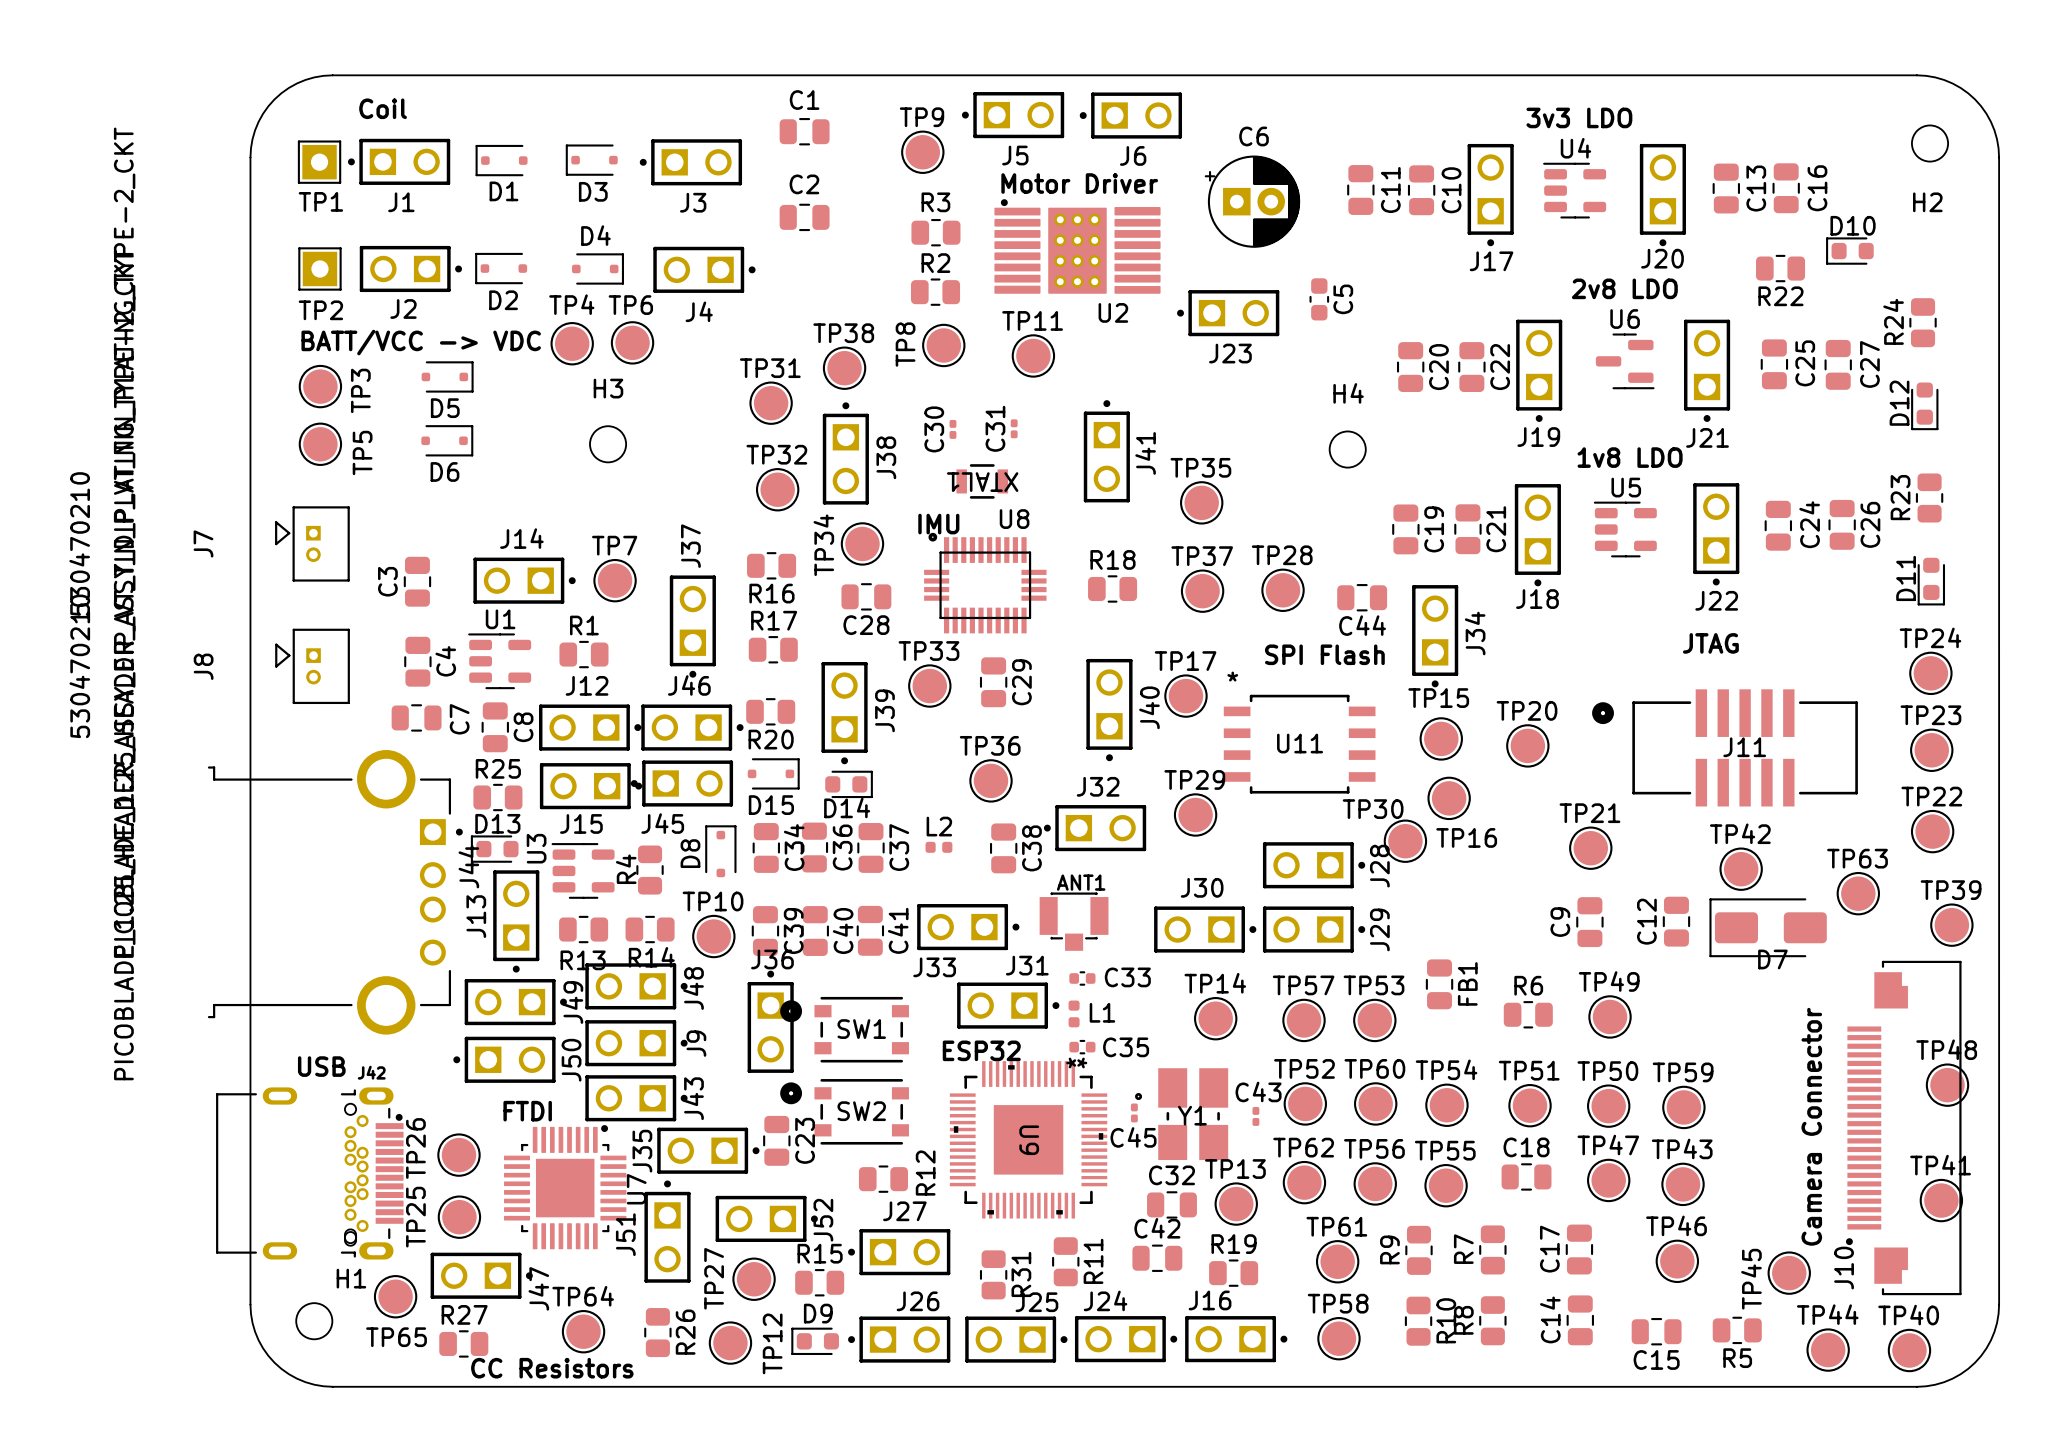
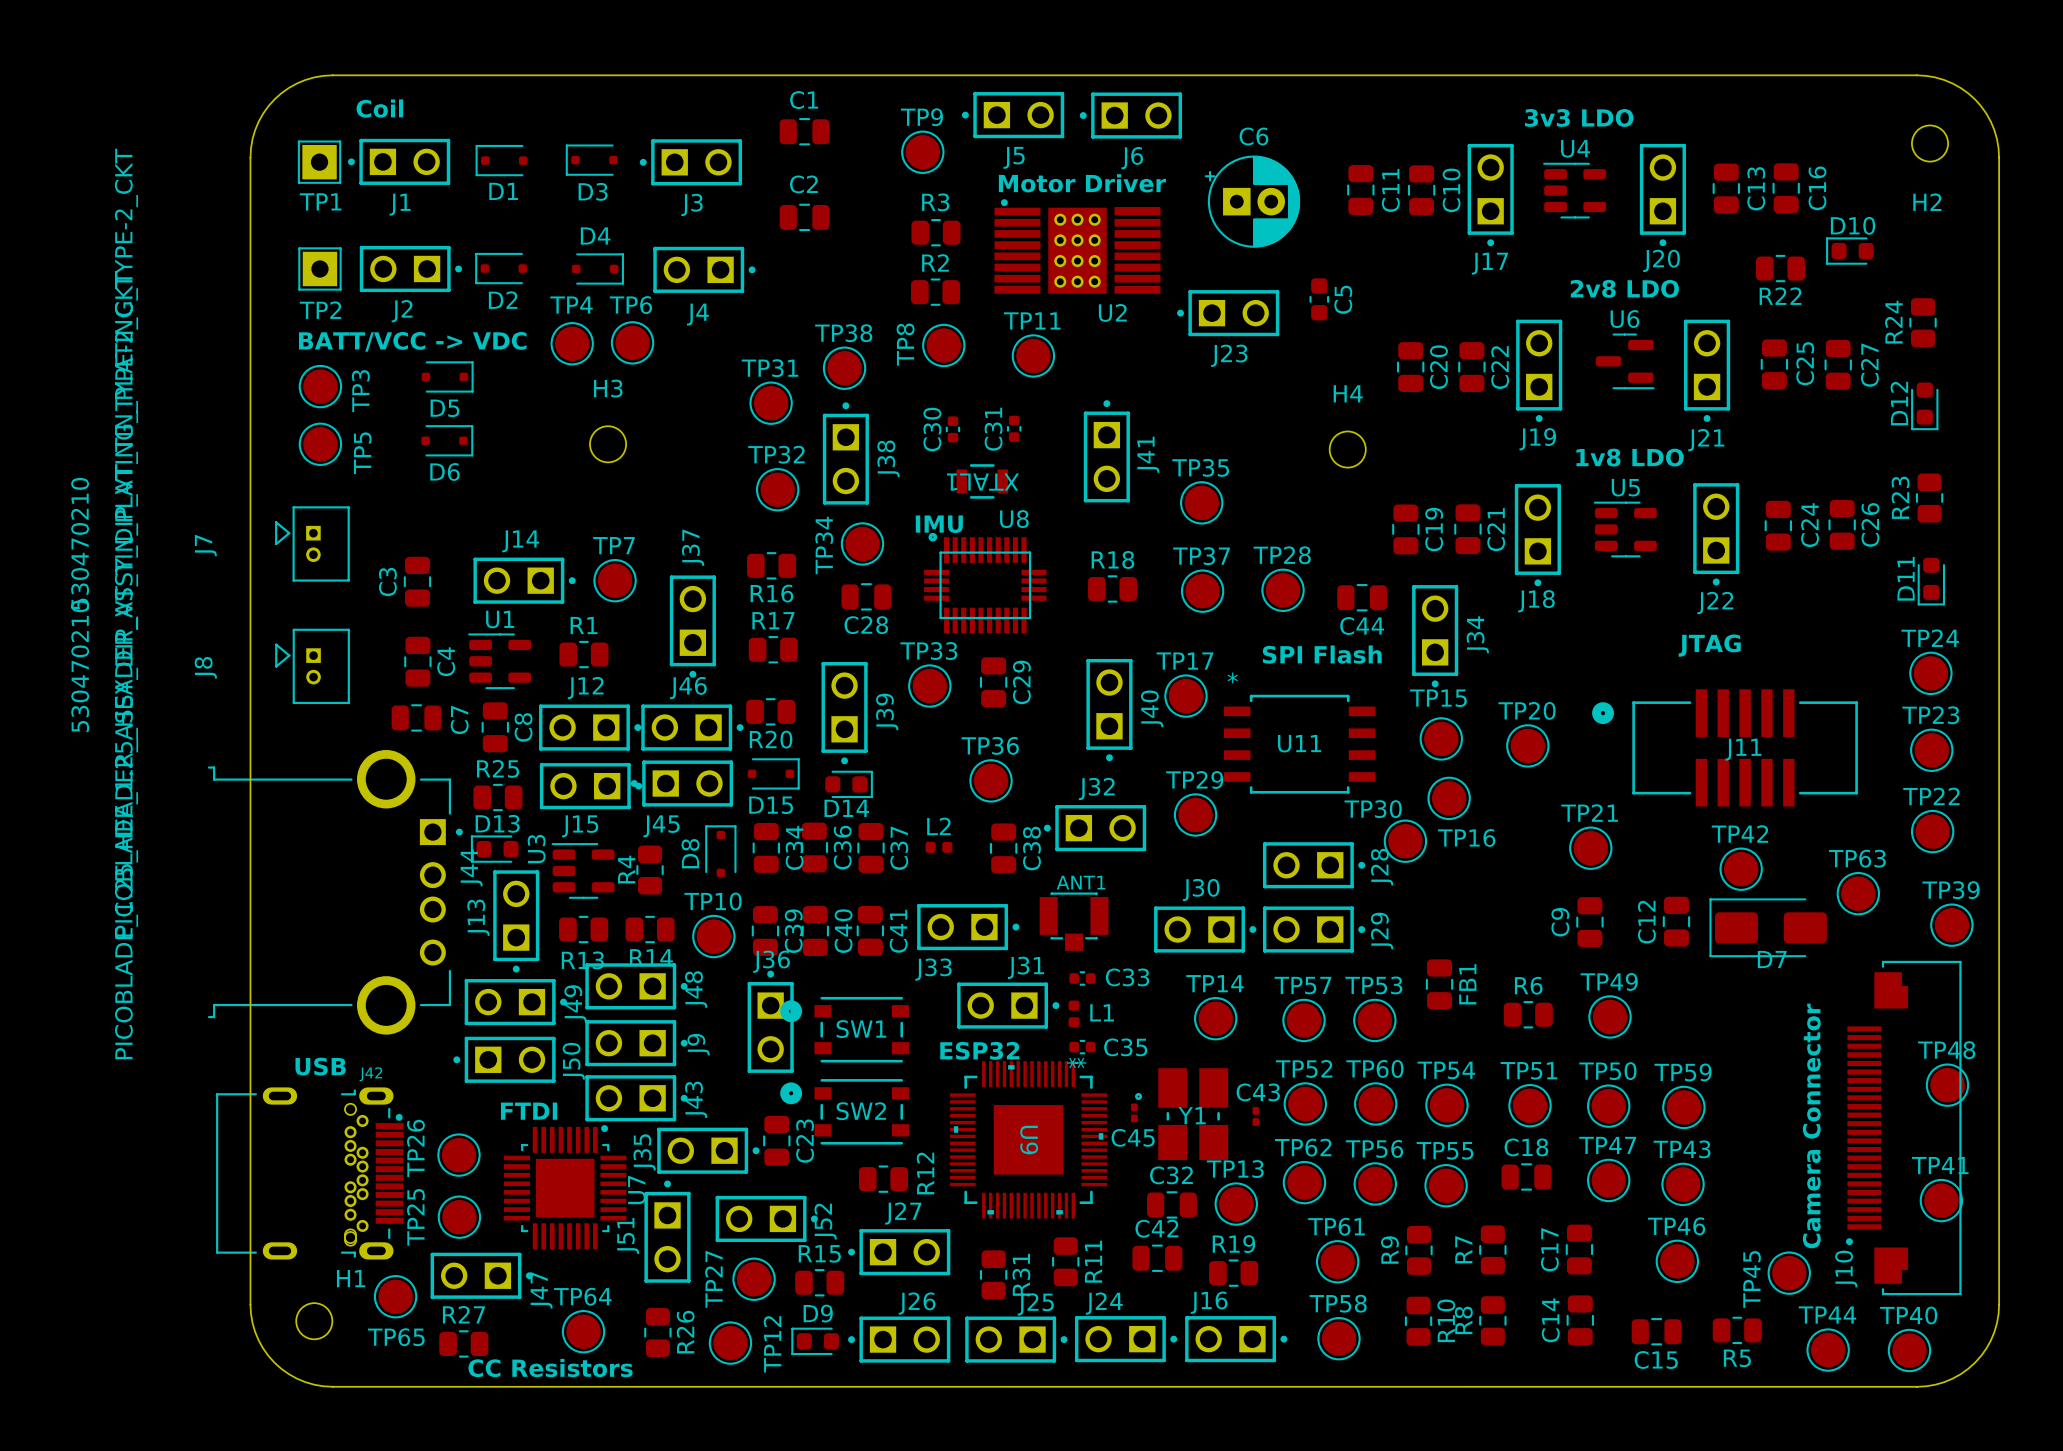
C30 footprint: [949, 419, 957, 439] -> [945, 416, 961, 443]
C31 footprint: [1010, 419, 1018, 439] -> [1006, 415, 1022, 442]

